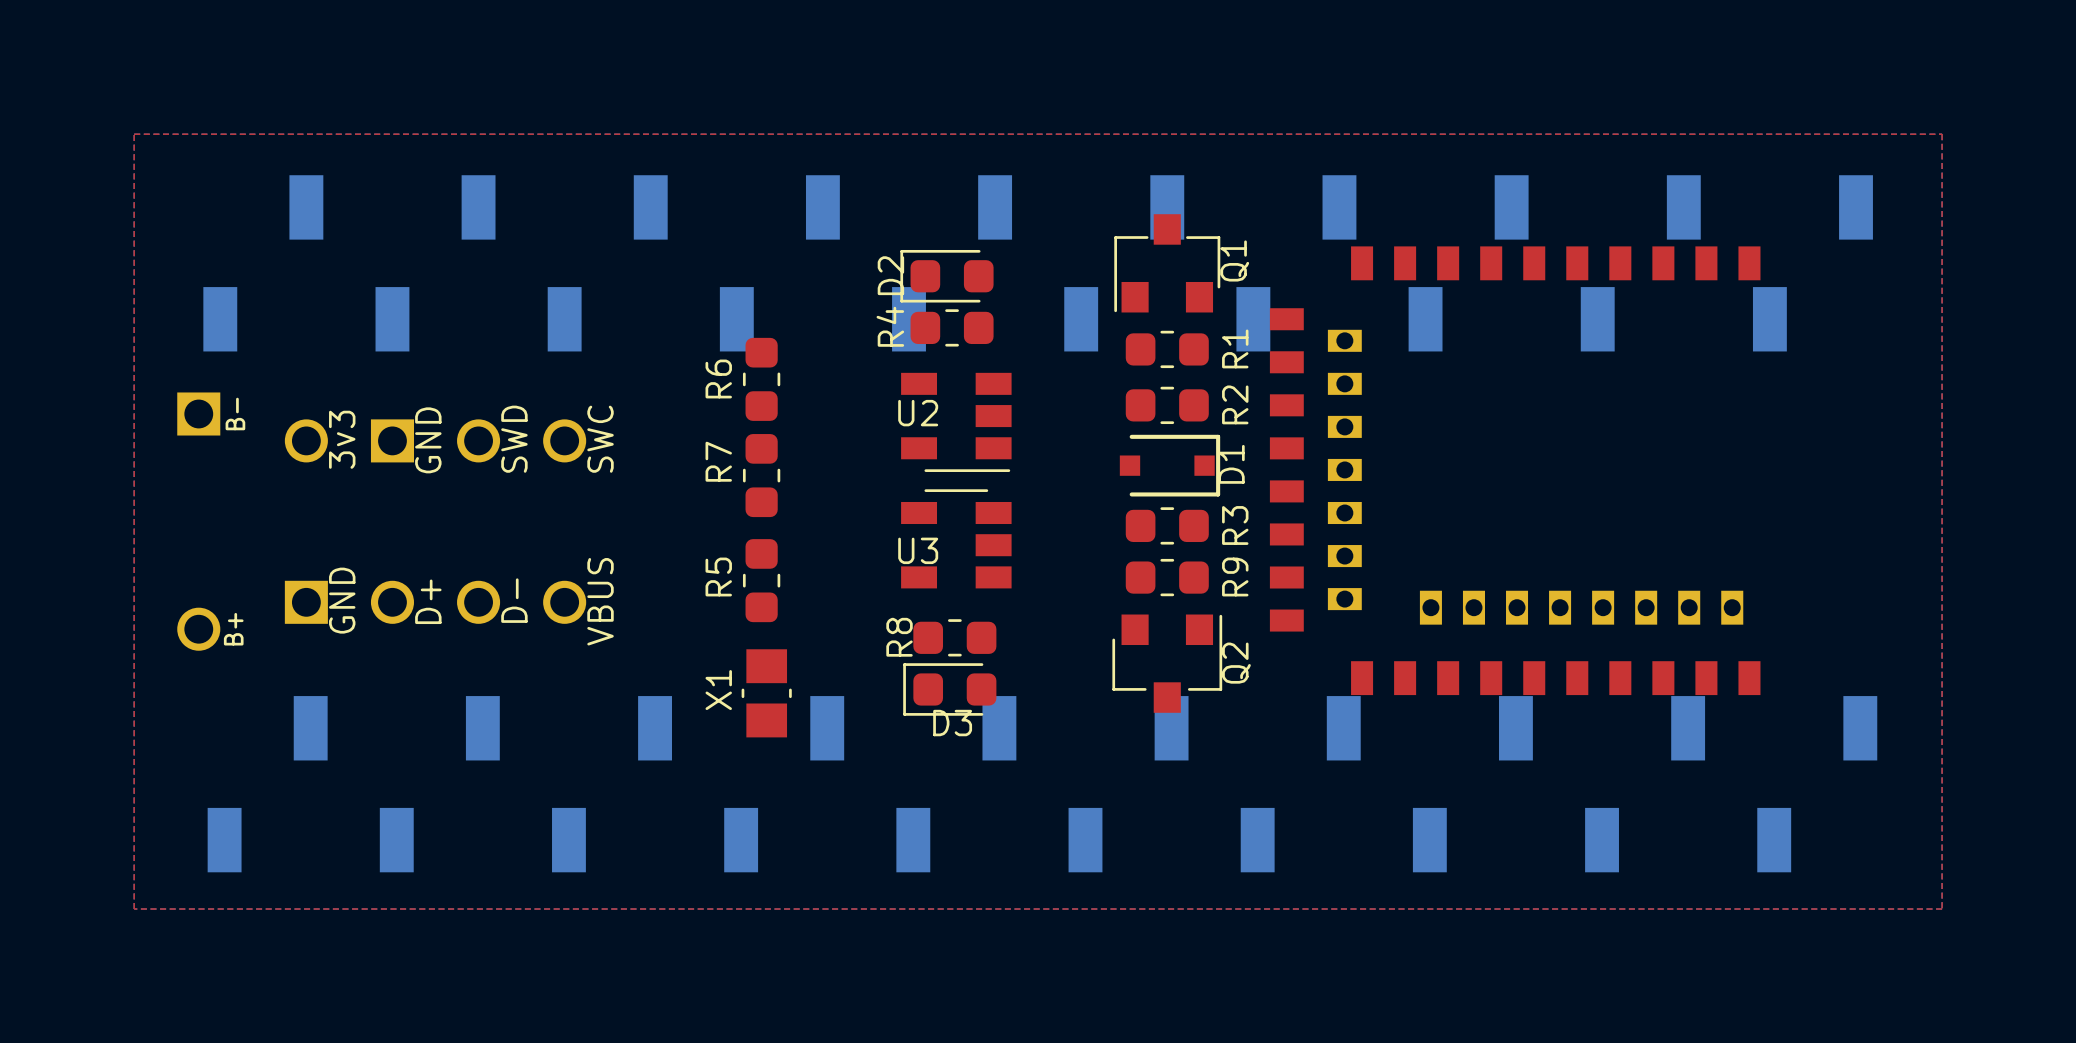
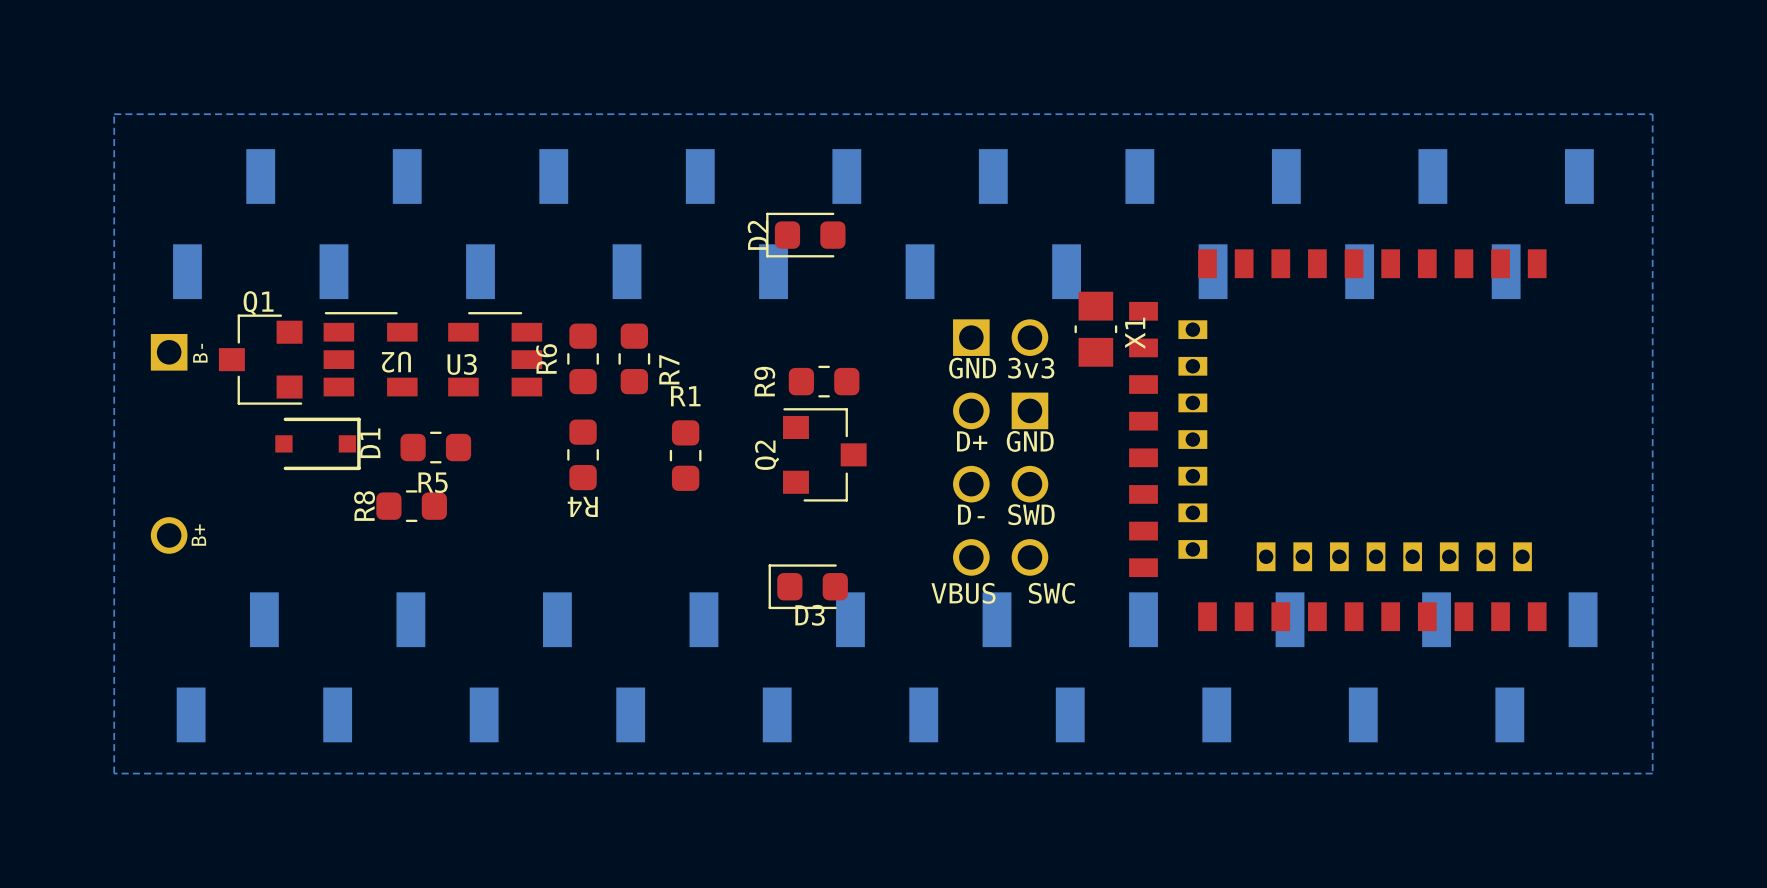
top zone outline: (134, 134) (134, 909) (1942, 909) (1942, 134) (134, 134) -> none
Q1 rotation: 0° (1167, 263) -> 90° counterclockwise (260, 359)
Q1 position: (1167, 263) -> (260, 359)
R4 name position: R4 (890, 326) -> R4 (582, 506)
R4 rotation: 0° (952, 327) -> 90° clockwise (583, 454)
R4 position: (952, 327) -> (583, 454)
R1 name position: R1 (1235, 348) -> R1 (685, 396)
R1 rotation: 0° (1167, 349) -> 90° clockwise (685, 455)
R1 position: (1167, 349) -> (685, 455)
R6 position: (761, 379) -> (583, 358)
R2: (1167, 405) -> none
U2 rotation: 0° (956, 422) -> 180° (370, 354)
U2 position: (956, 422) -> (370, 354)
part: (435, 440) -> none
R7 name position: R7 (718, 461) -> R7 (669, 369)
D1 position: (1169, 465) -> (317, 443)
part position: (1515, 470) -> (1337, 440)
R7 position: (761, 475) -> (634, 358)
part: none -> (971, 447)
R3: (1167, 525) -> none
part: none -> (1029, 447)
U3 position: (956, 538) -> (495, 354)
R9 position: (1167, 577) -> (824, 381)
R9 name position: R9 (1235, 577) -> R9 (764, 381)
R5 rotation: 0° (761, 580) -> 90° clockwise (435, 447)
R5 position: (761, 580) -> (435, 447)
part: (435, 602) -> none
R8 position: (954, 637) -> (411, 506)
Q2 rotation: 0° (1167, 663) -> 90° counterclockwise (824, 454)
Q2 position: (1167, 663) -> (824, 454)
Q2 name position: Q2 (1236, 663) -> Q2 (767, 455)
X1 name position: X1 (718, 690) -> X1 (1135, 333)
X1 position: (766, 693) -> (1095, 329)

